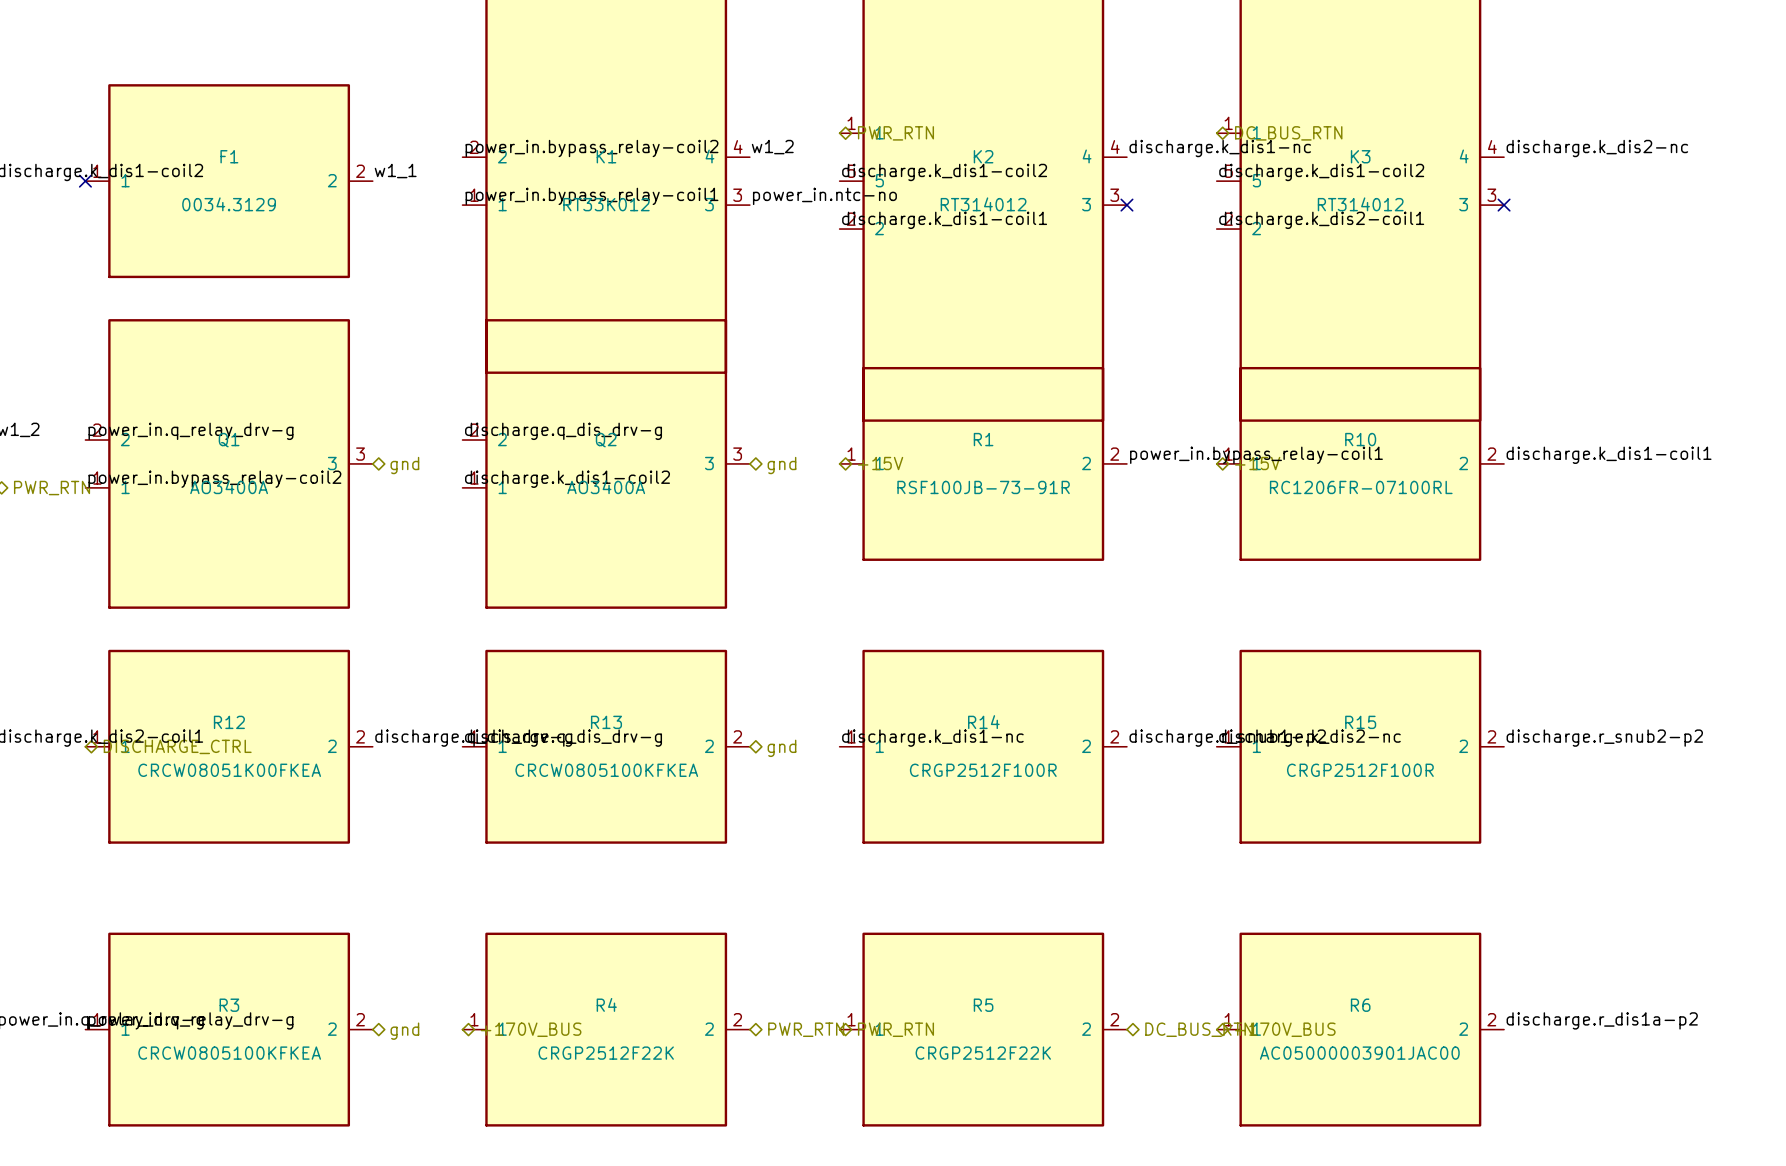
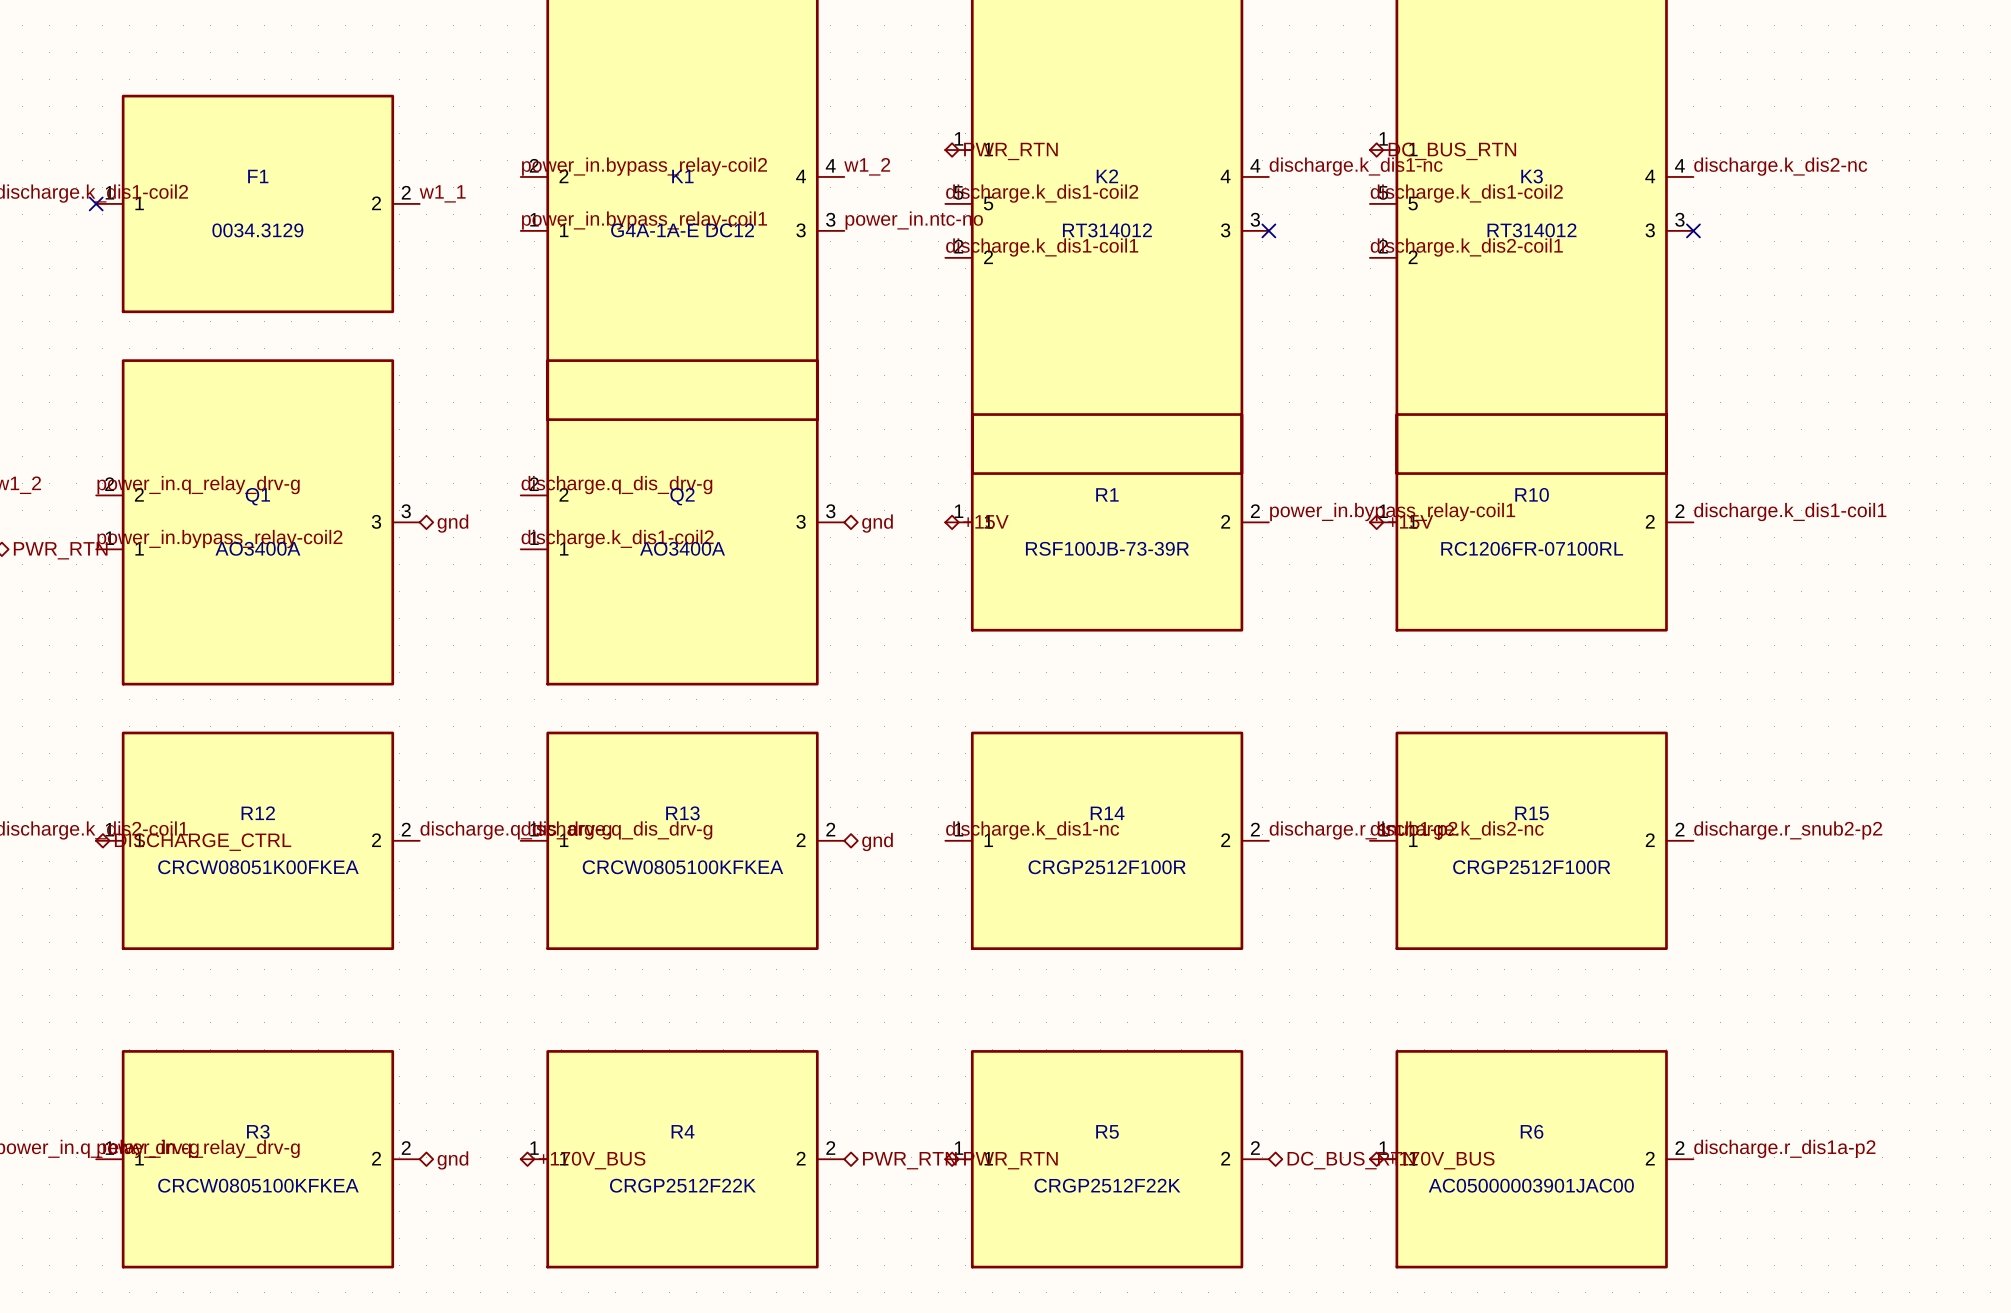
K1 value: RT33K012 (606, 204) -> G4A-1A-E DC12 (682, 230)
R1 value: RSF100JB-73-91R (983, 487) -> RSF100JB-73-39R (1107, 548)

